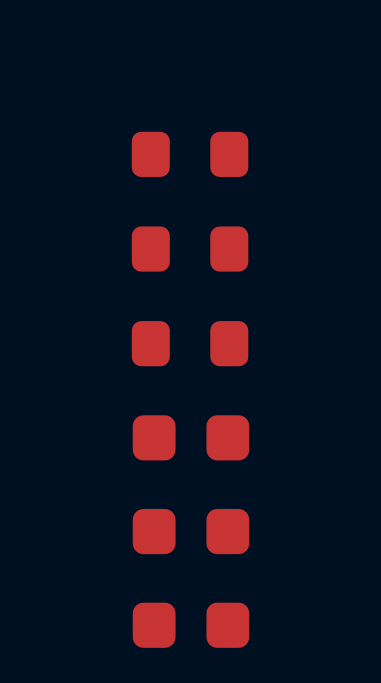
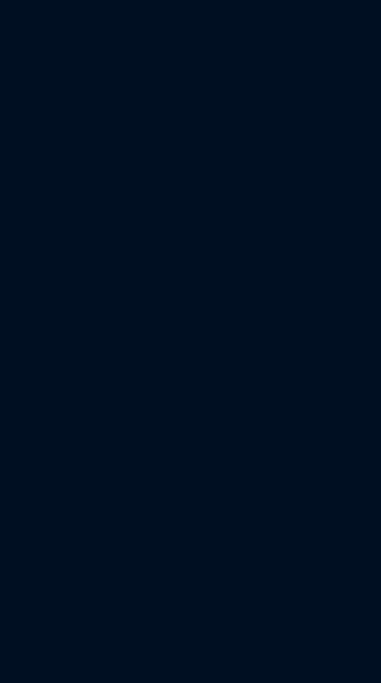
part: (190, 154) -> none
part: (190, 249) -> none
part: (190, 343) -> none
part: (191, 437) -> none
part: (191, 531) -> none
part: (191, 625) -> none

